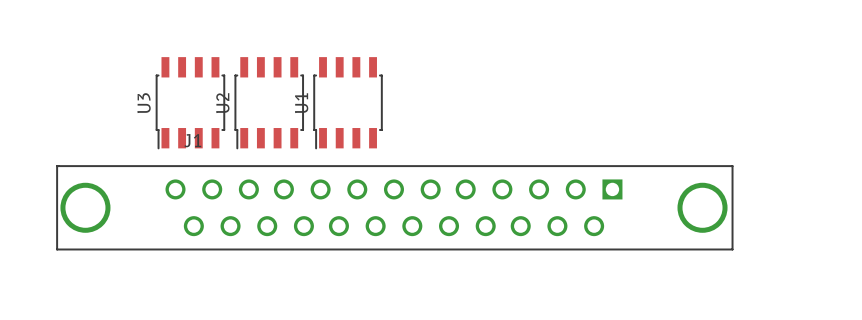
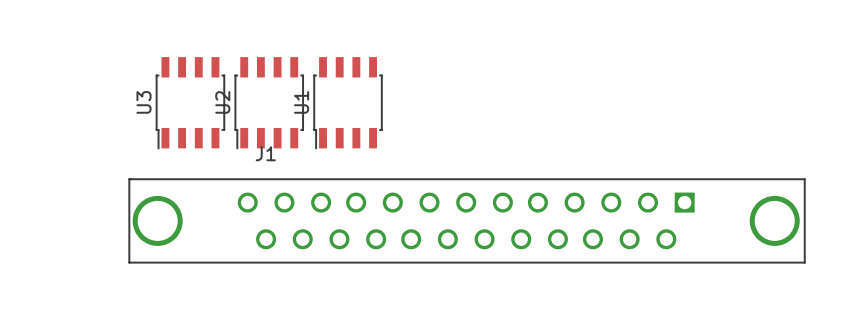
J1 position: (394, 207) -> (467, 220)

